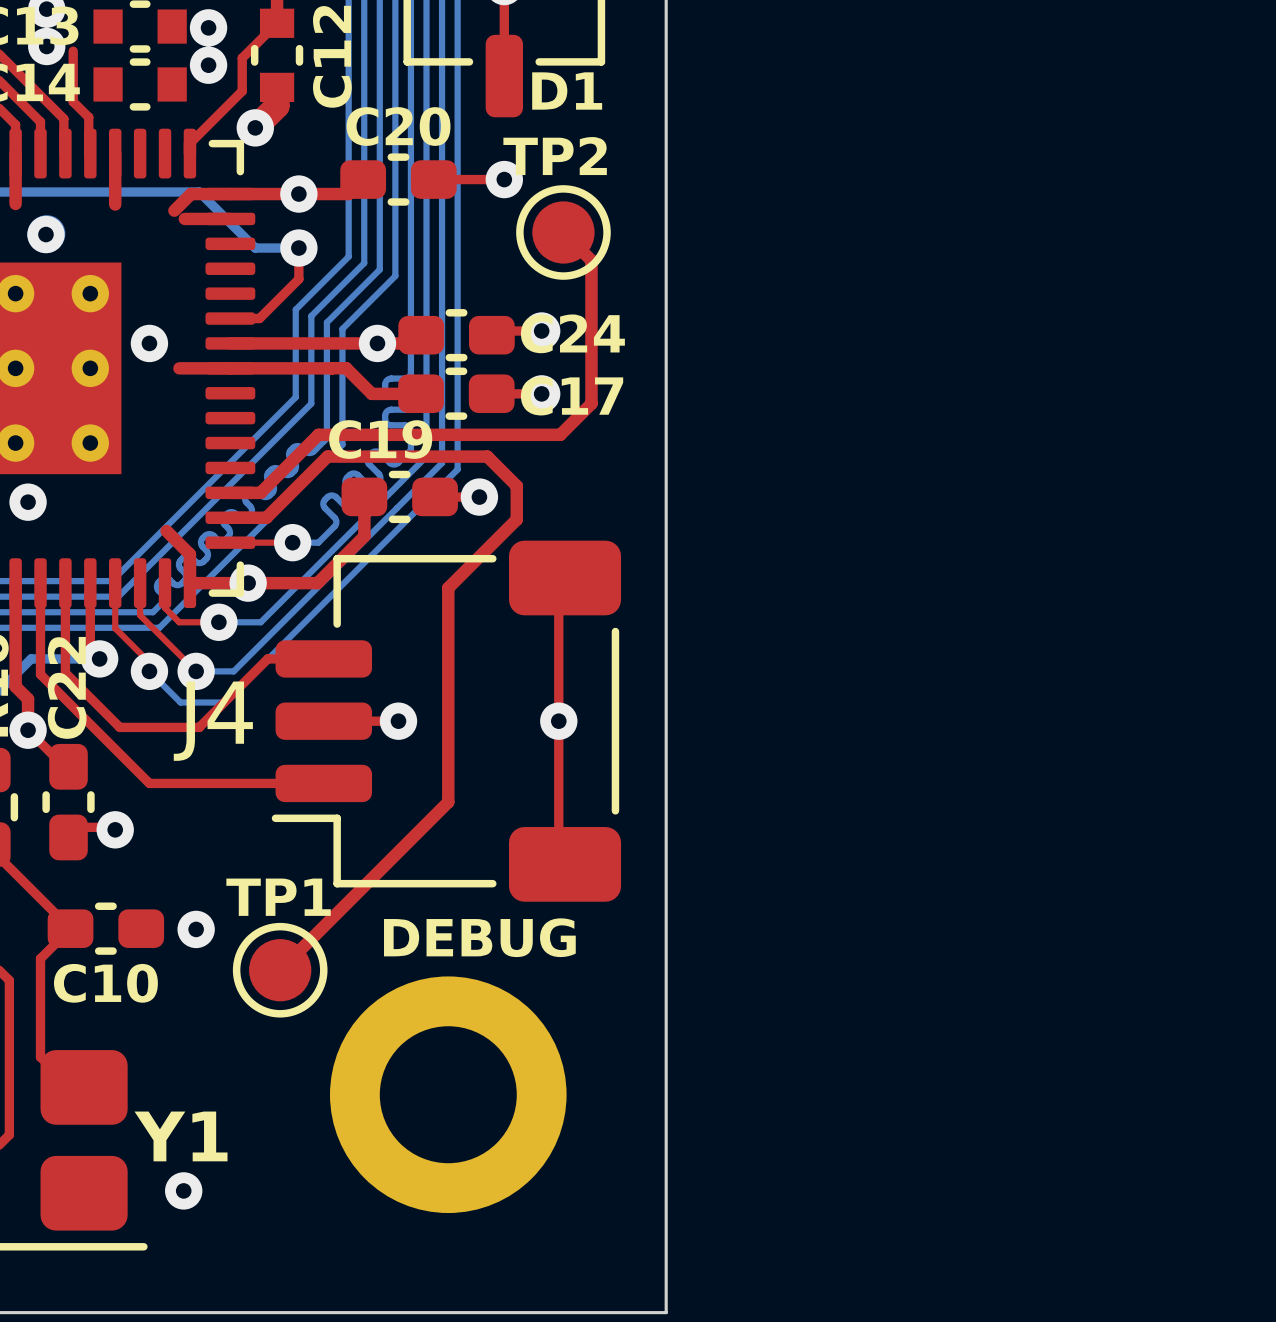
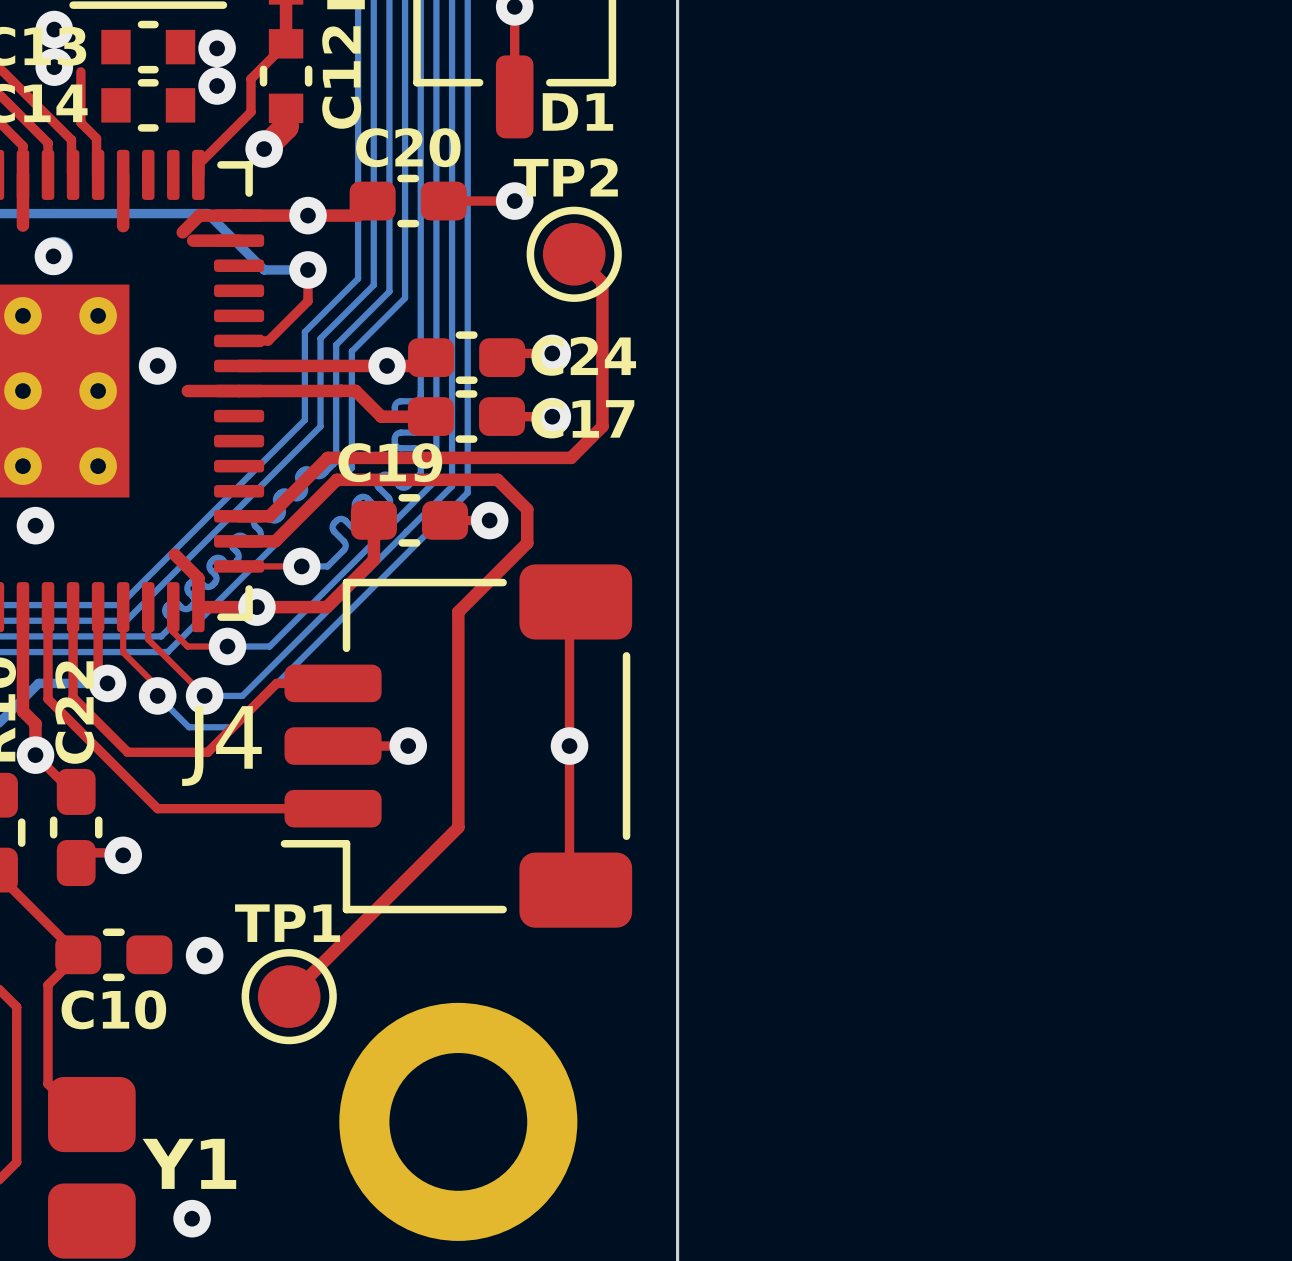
text: DEBUG (479, 937) -> none

